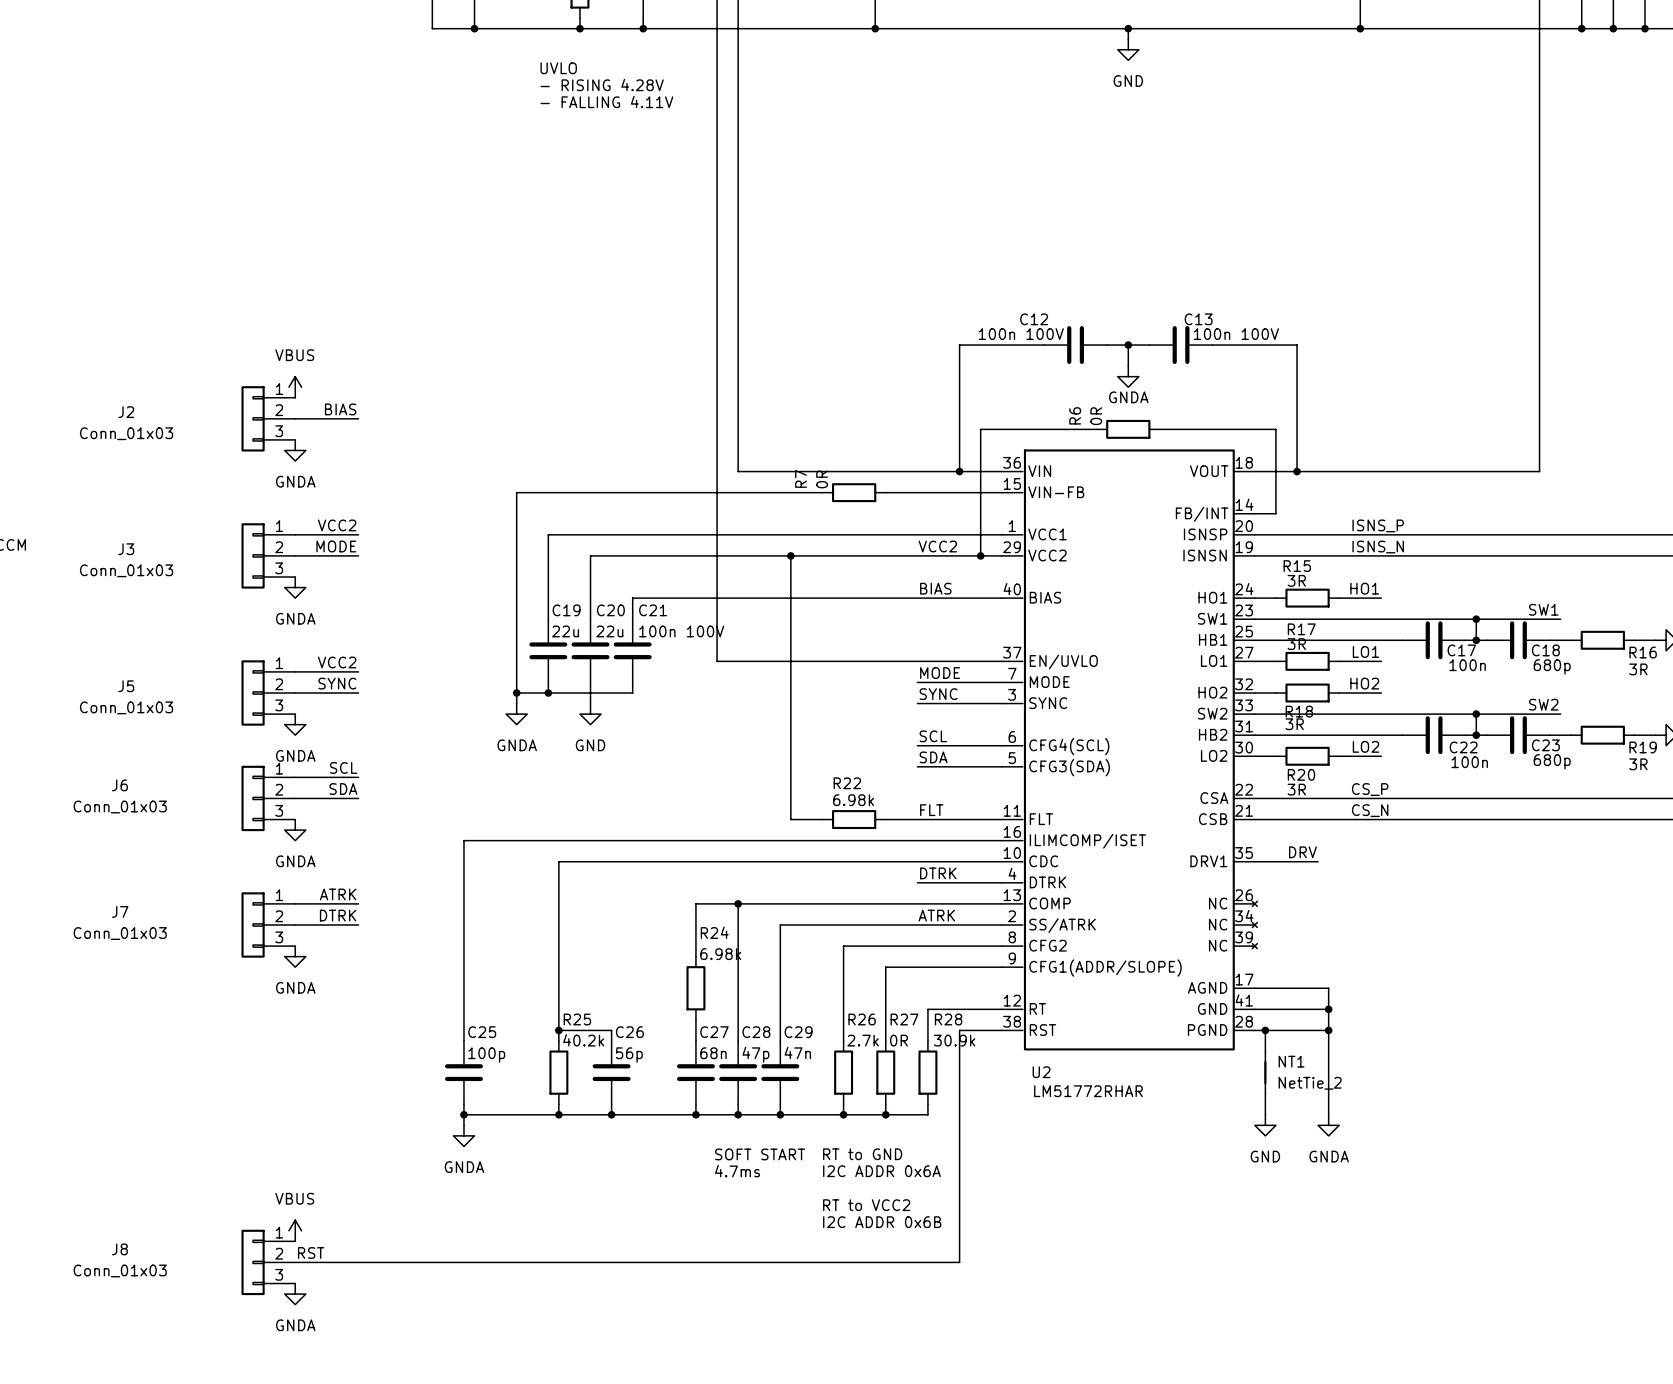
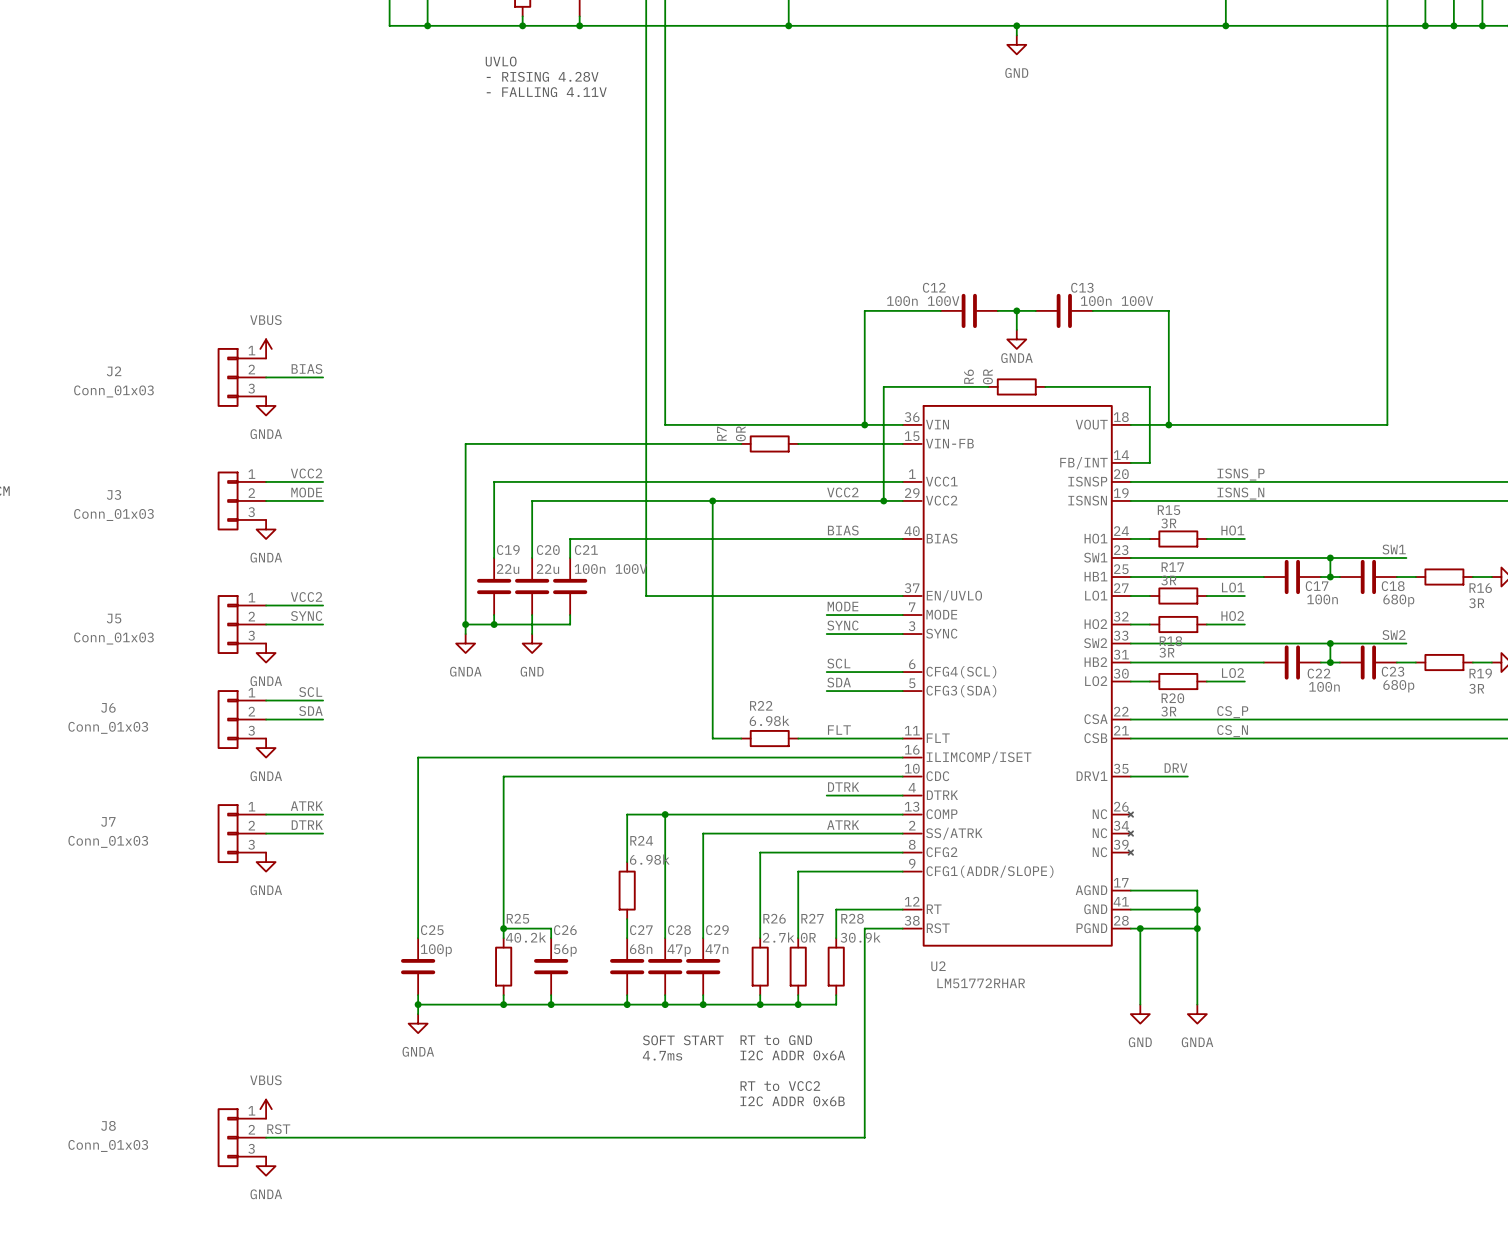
NT1: NetTie_2 (1265, 1072) -> none

